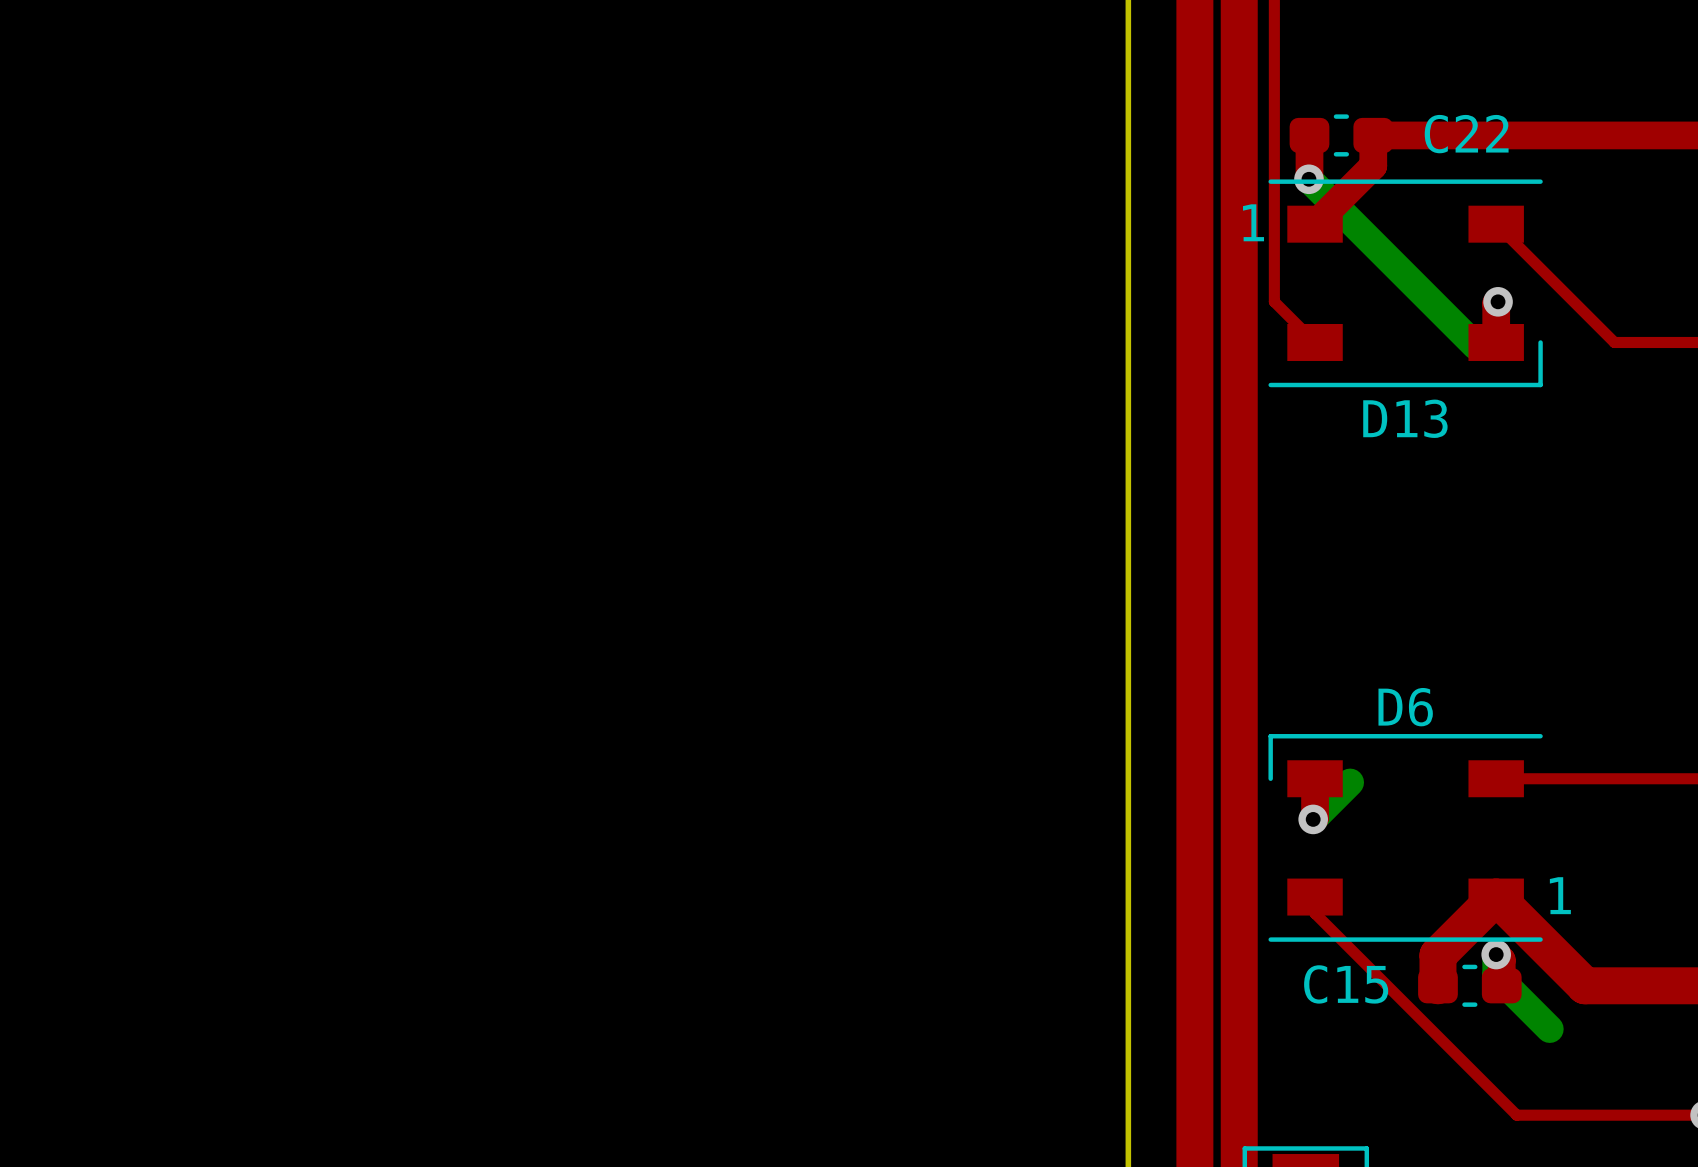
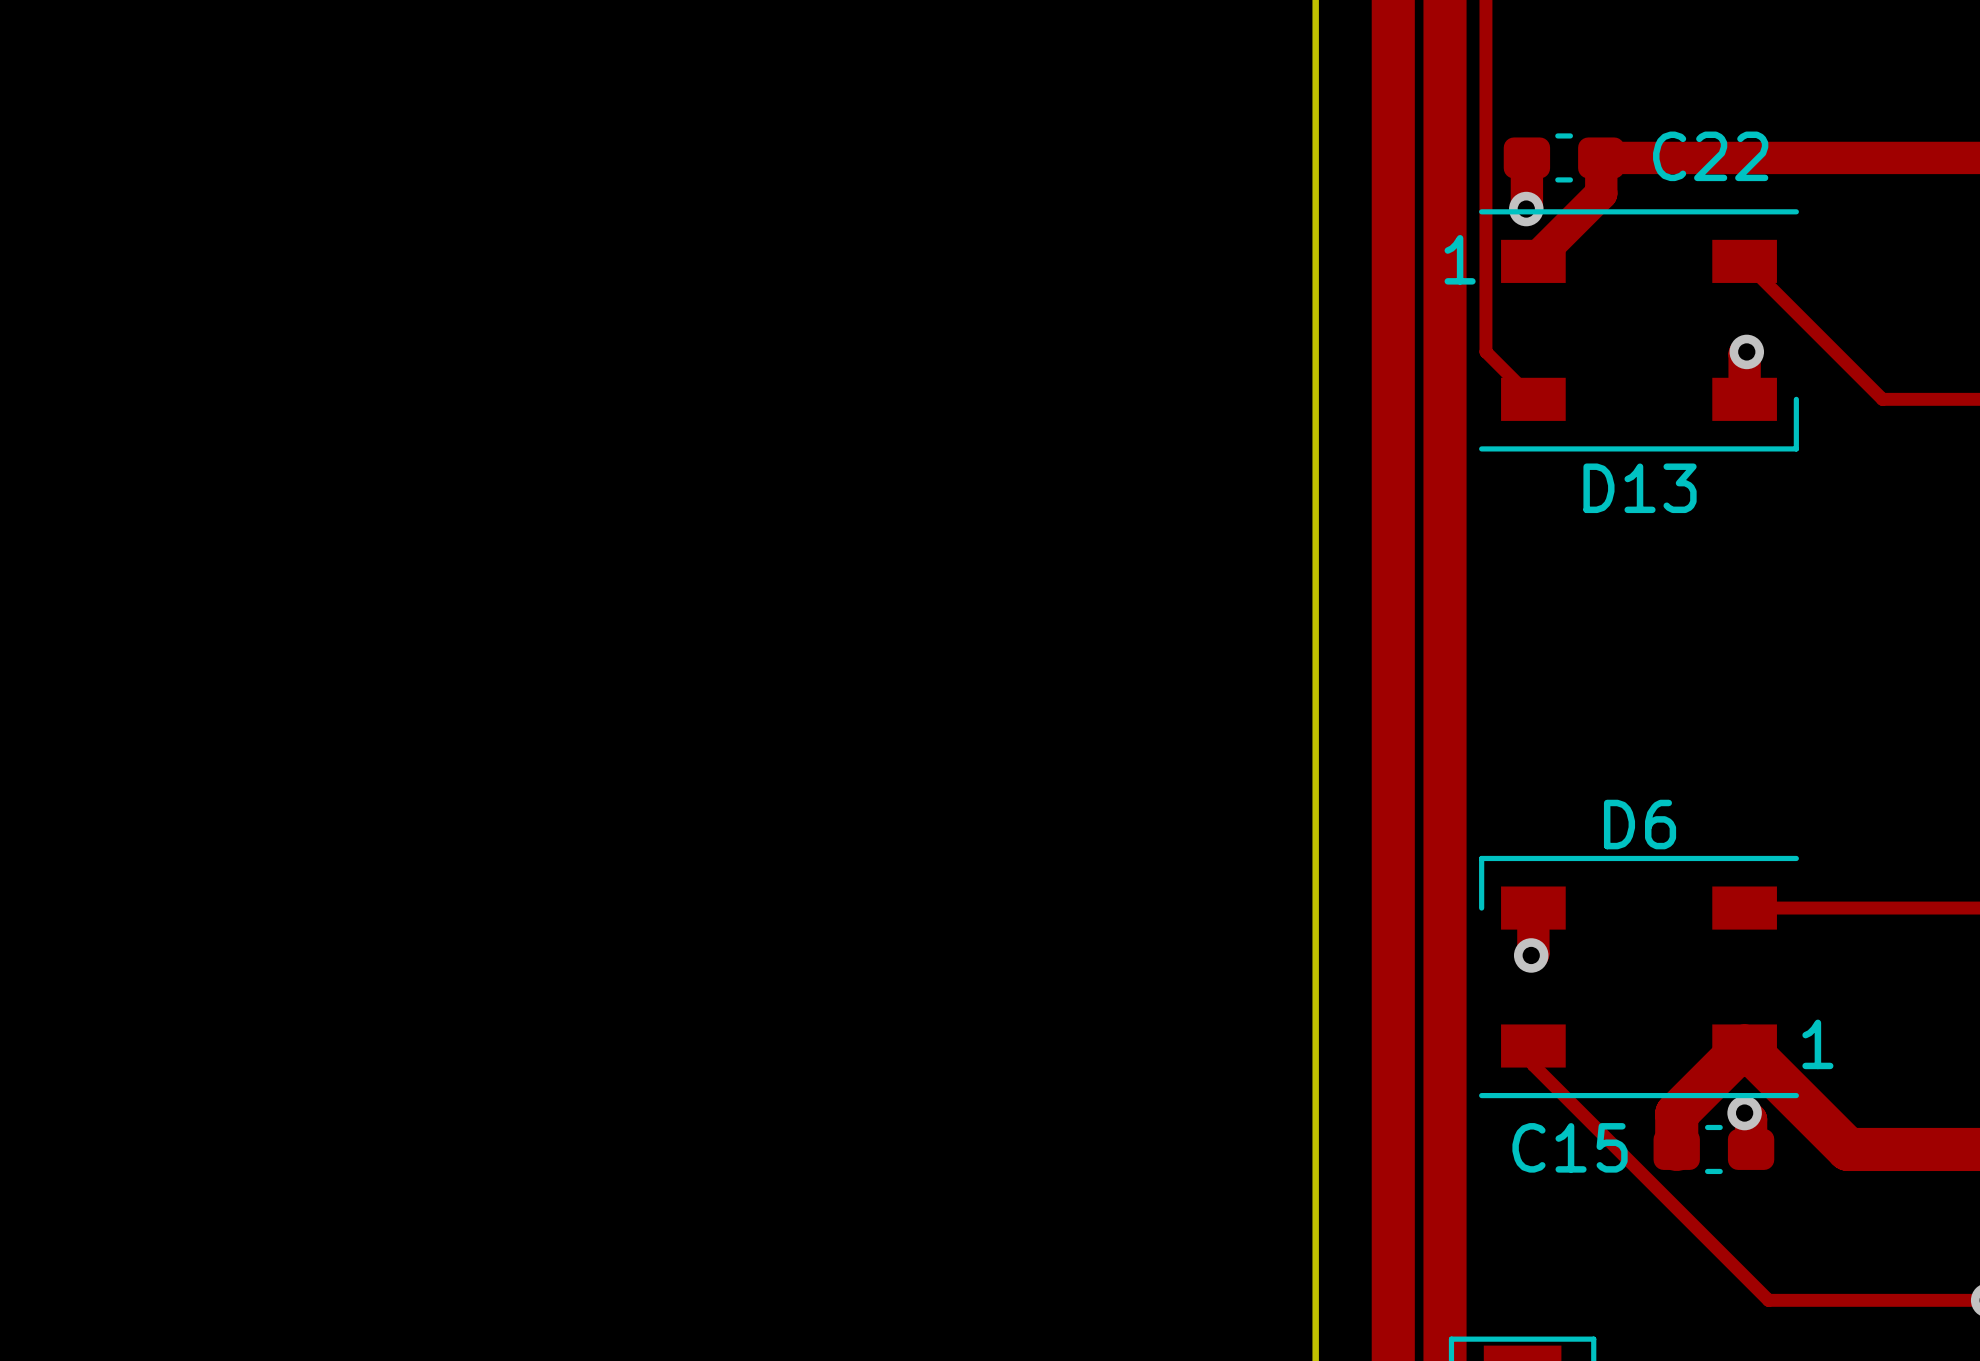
bottom track: (1308, 179) (1475, 346) -> none
bottom track: (1350, 782) (1313, 819) -> none
bottom track: (1496, 954) (1496, 975) (1549, 1029) -> none

